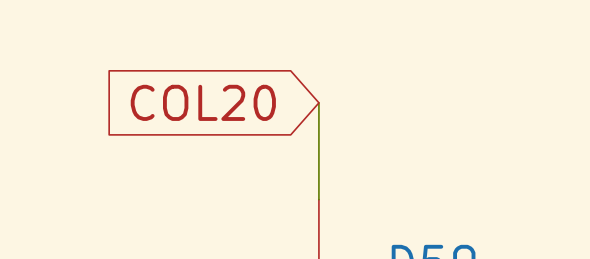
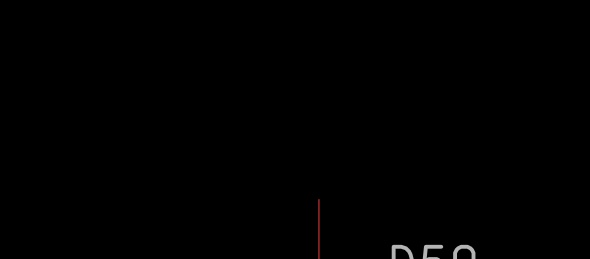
global label: COL20 (203, 102) -> none
wire: (318, 102) (318, 199) -> none

